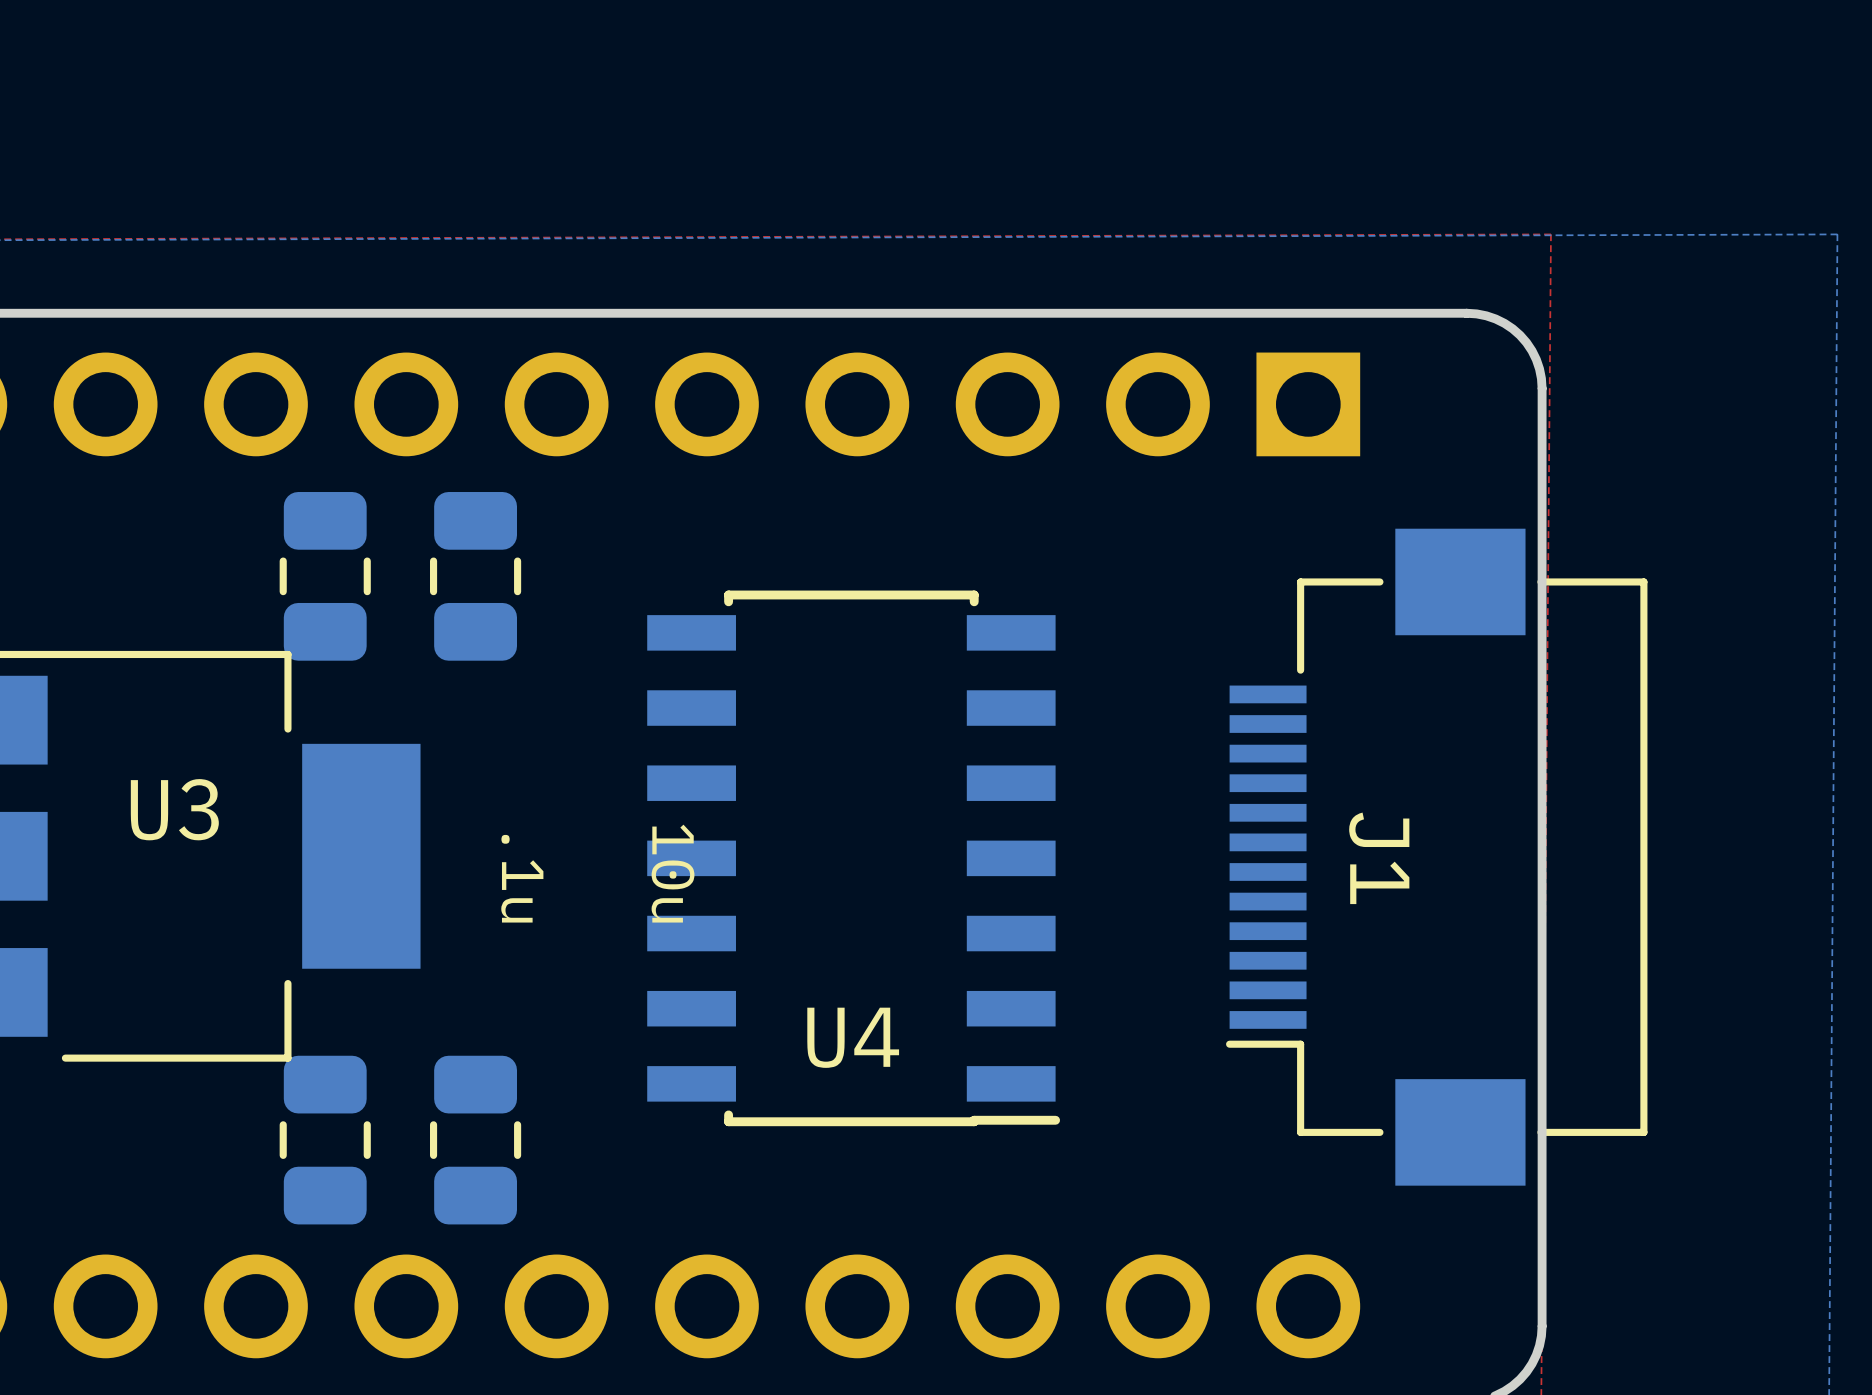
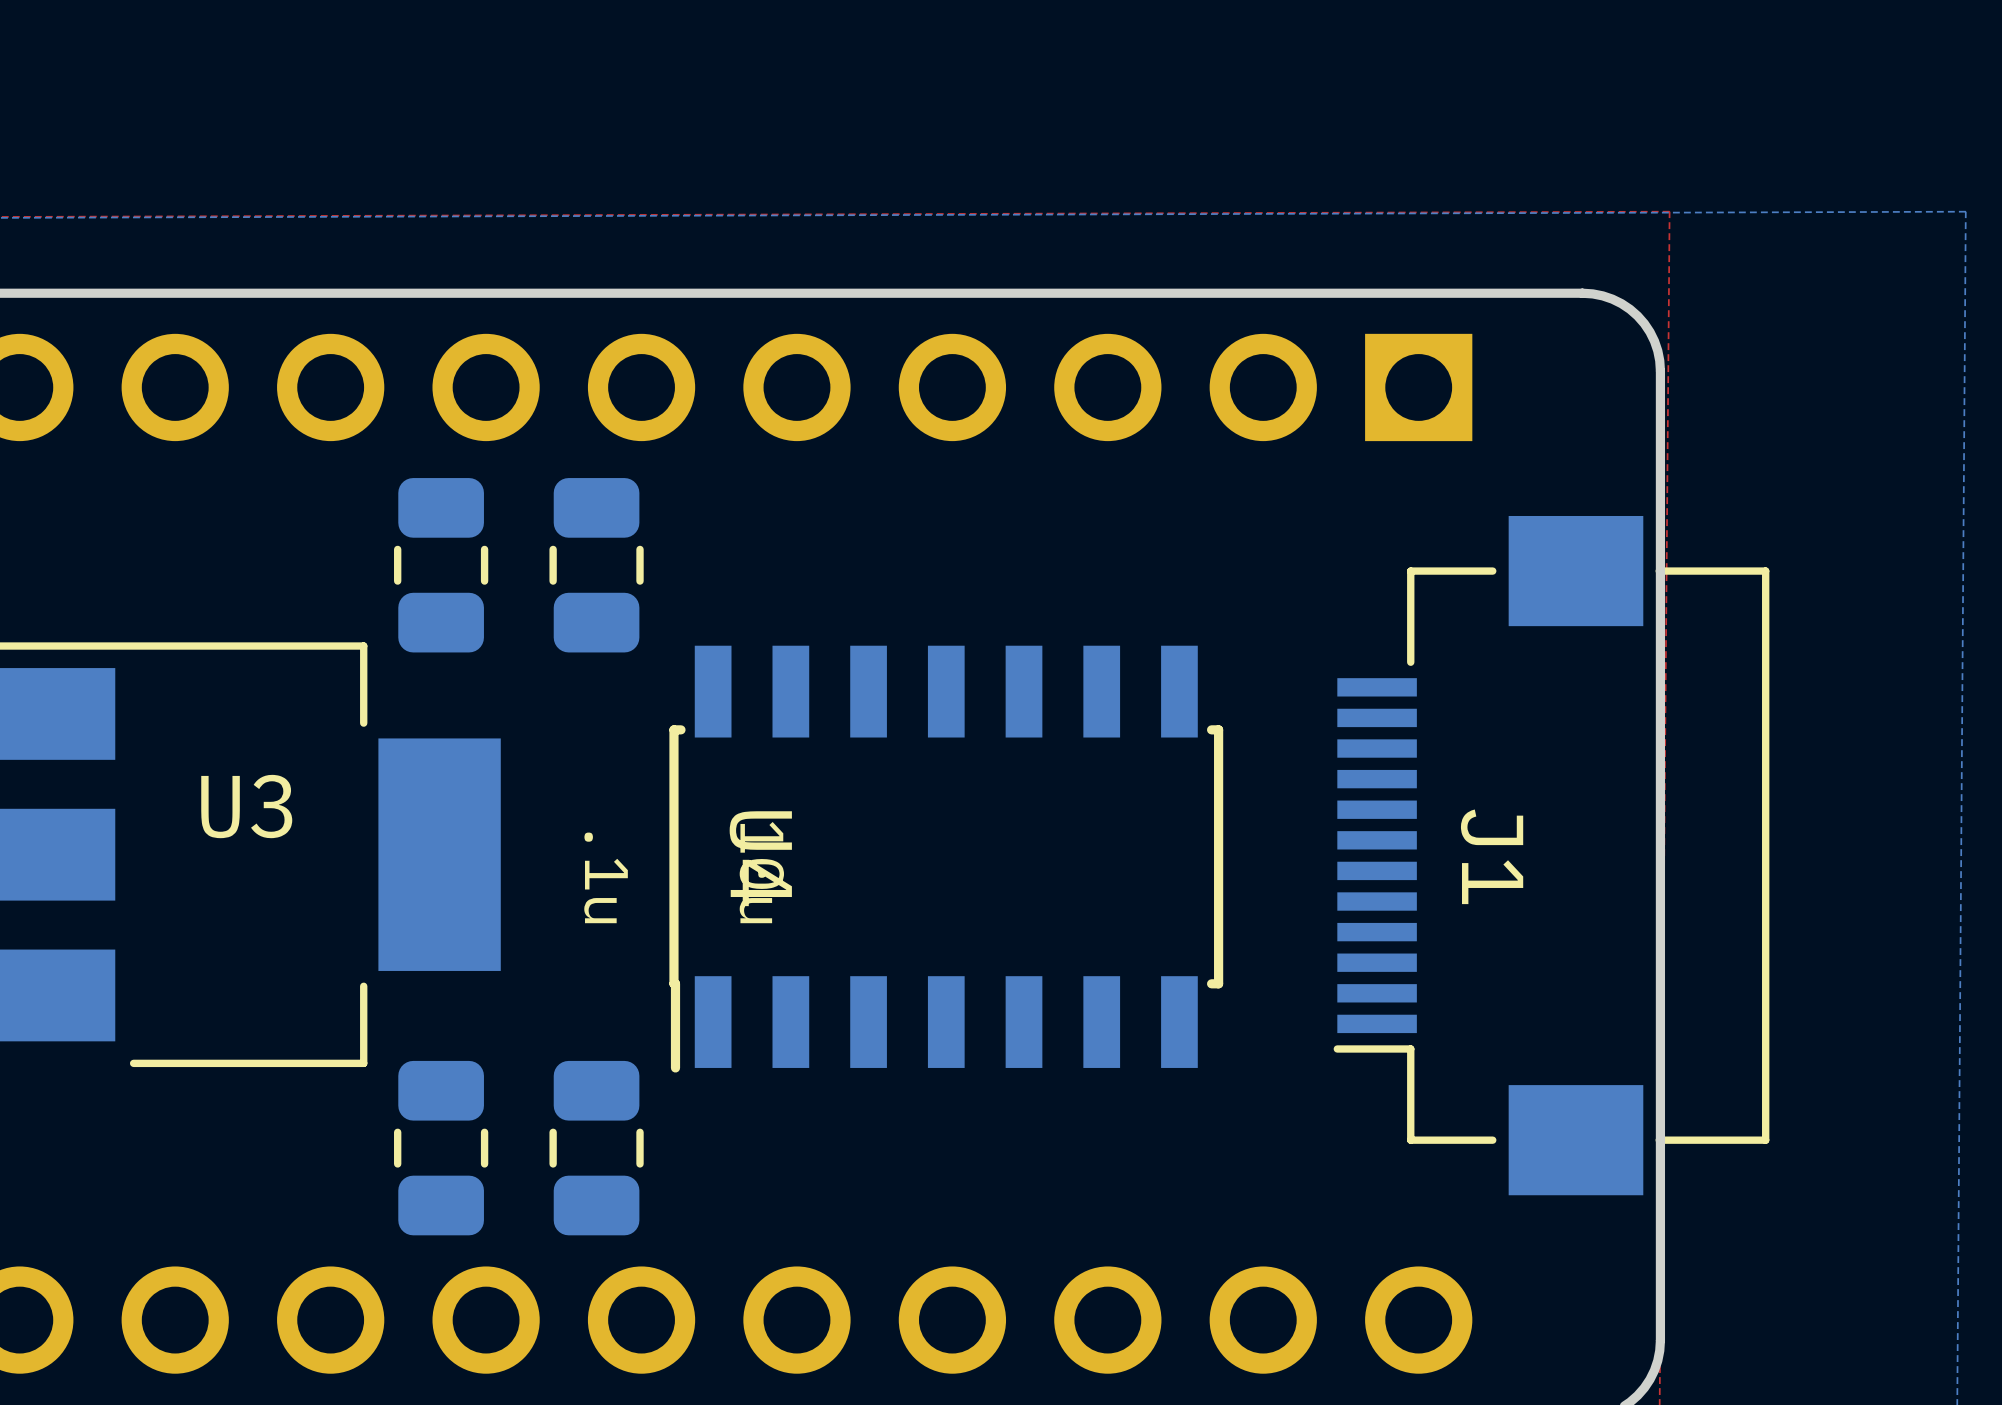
part position: (325, 576) -> (441, 565)
part position: (475, 576) -> (596, 565)
U4 rotation: 0° (853, 858) -> 90° clockwise (946, 859)
part position: (325, 1140) -> (441, 1148)
part position: (475, 1140) -> (596, 1148)

